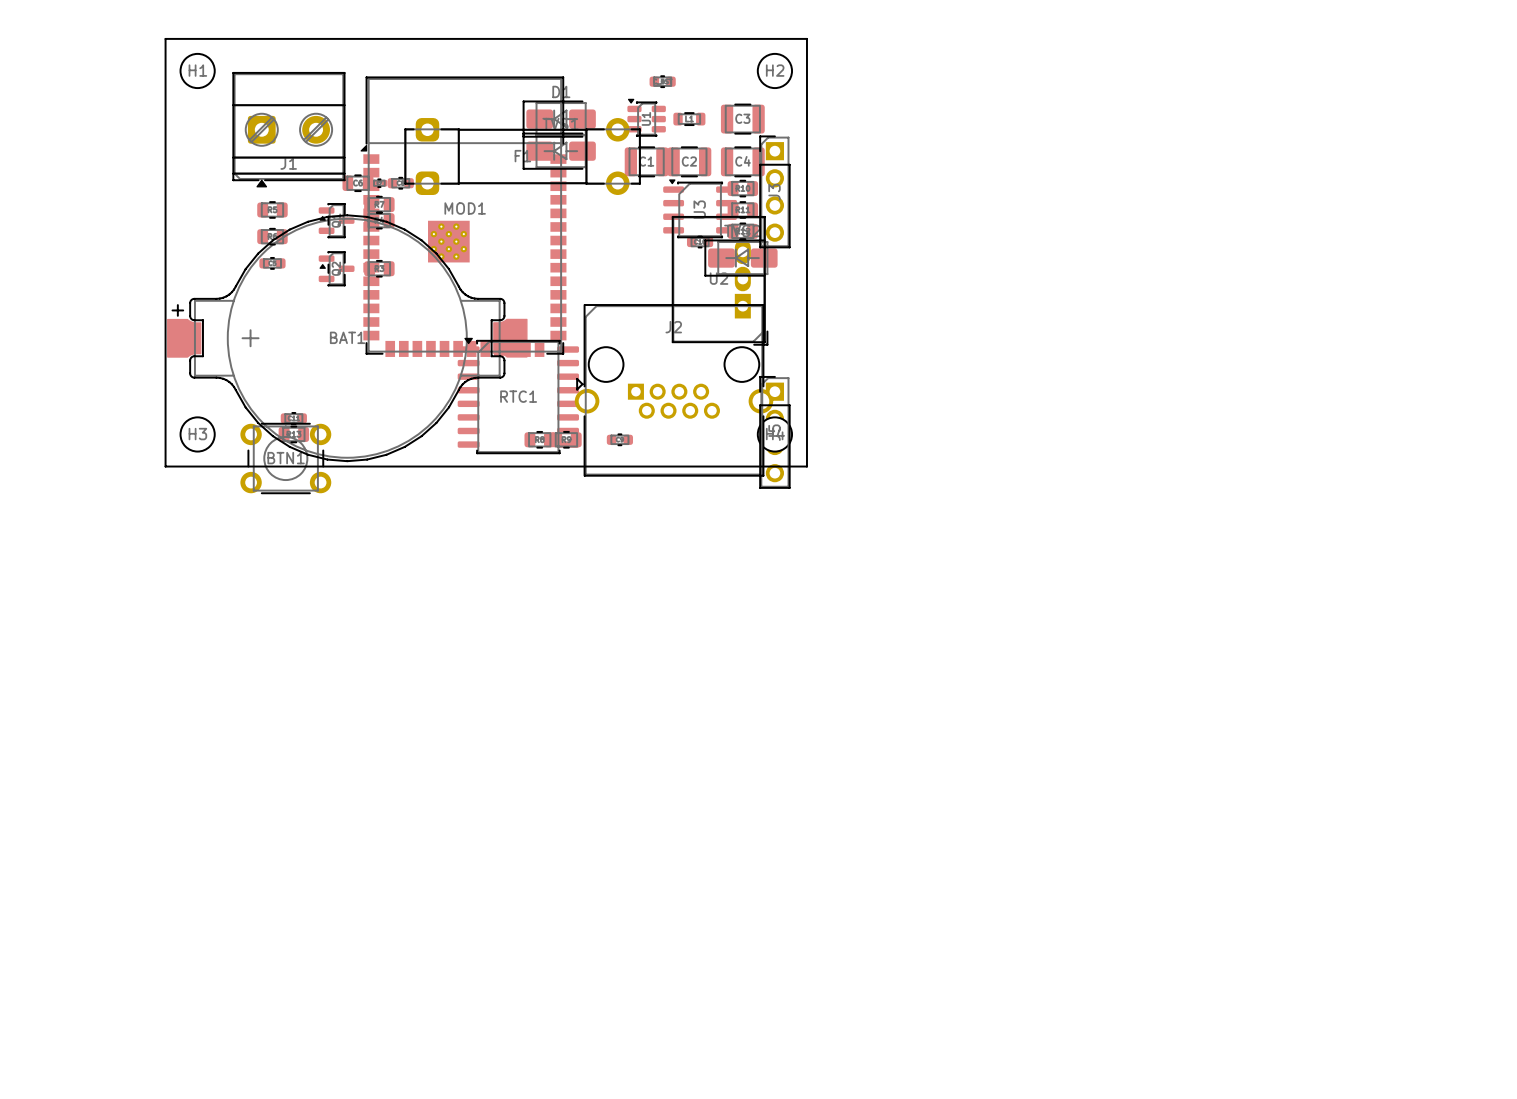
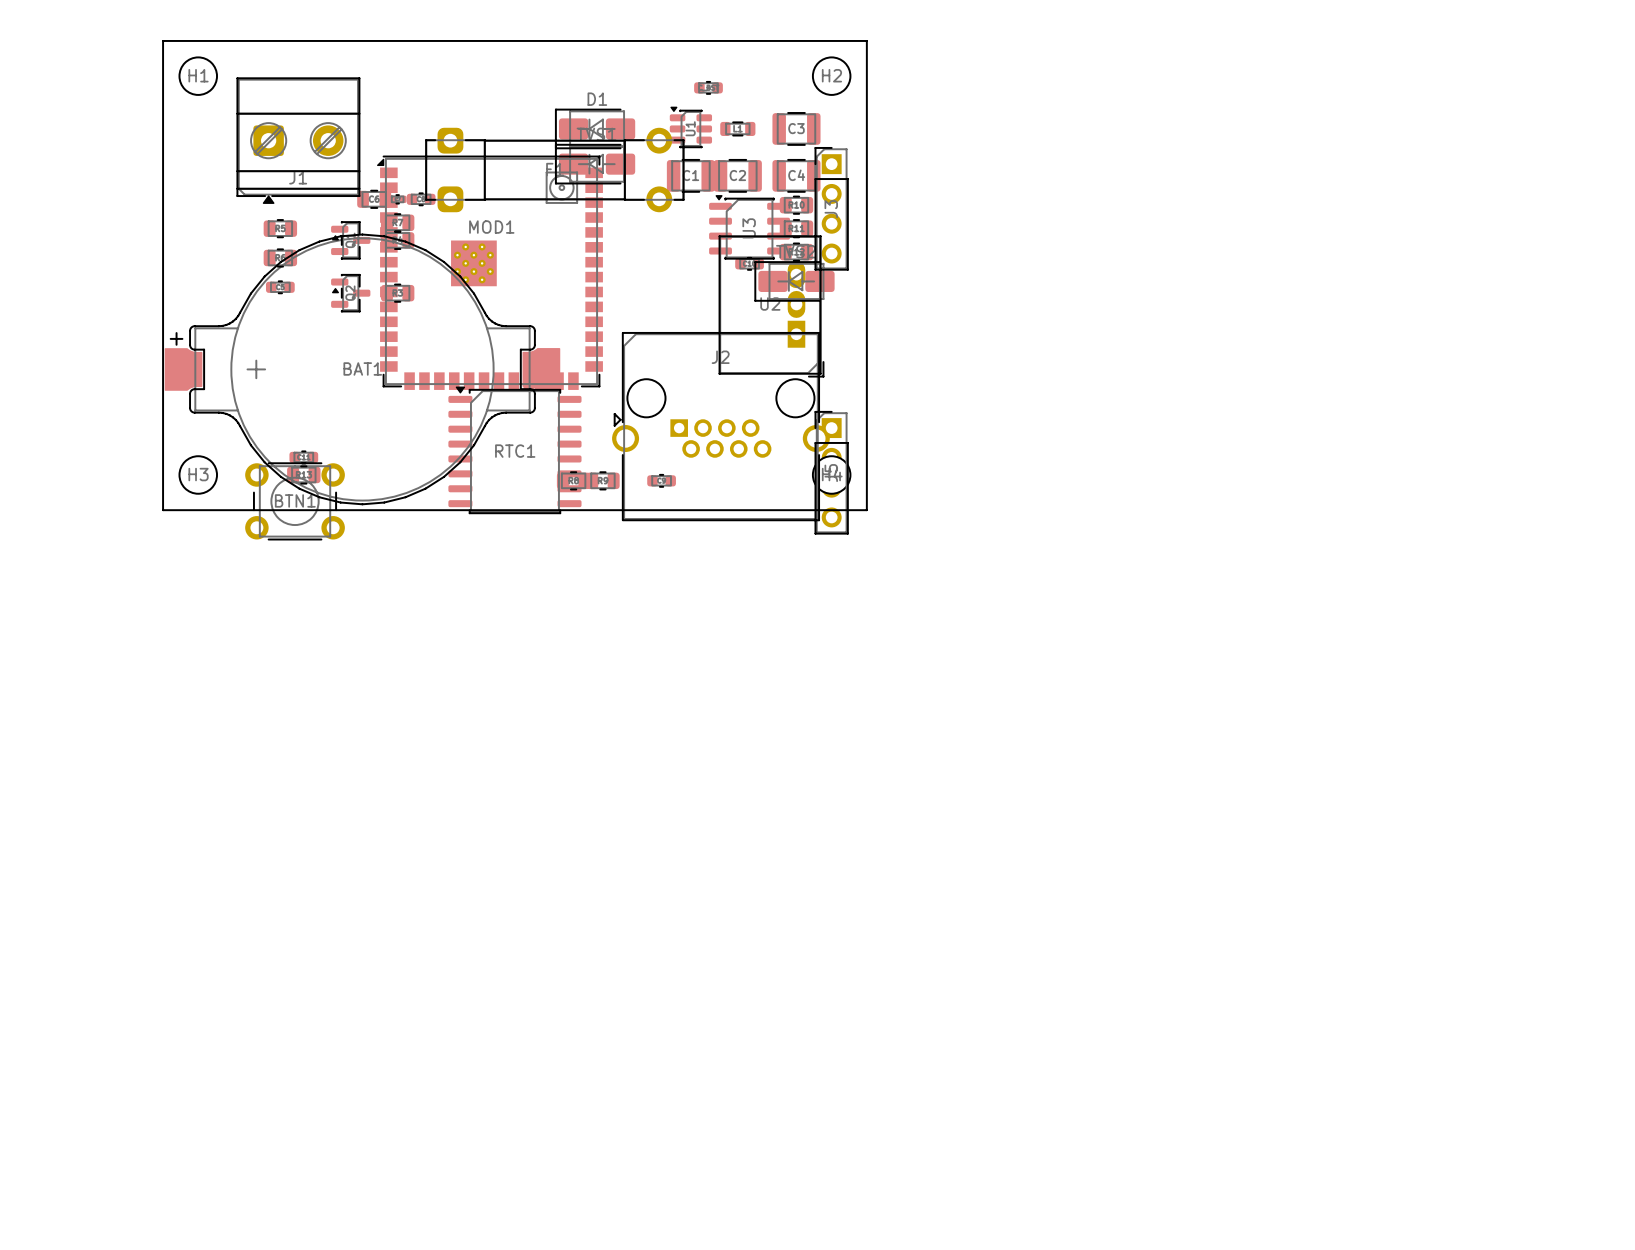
MOD1 footprint: [360, 76, 567, 357] -> [377, 155, 603, 390]
RTC1 position: (518, 395) -> (514, 450)

